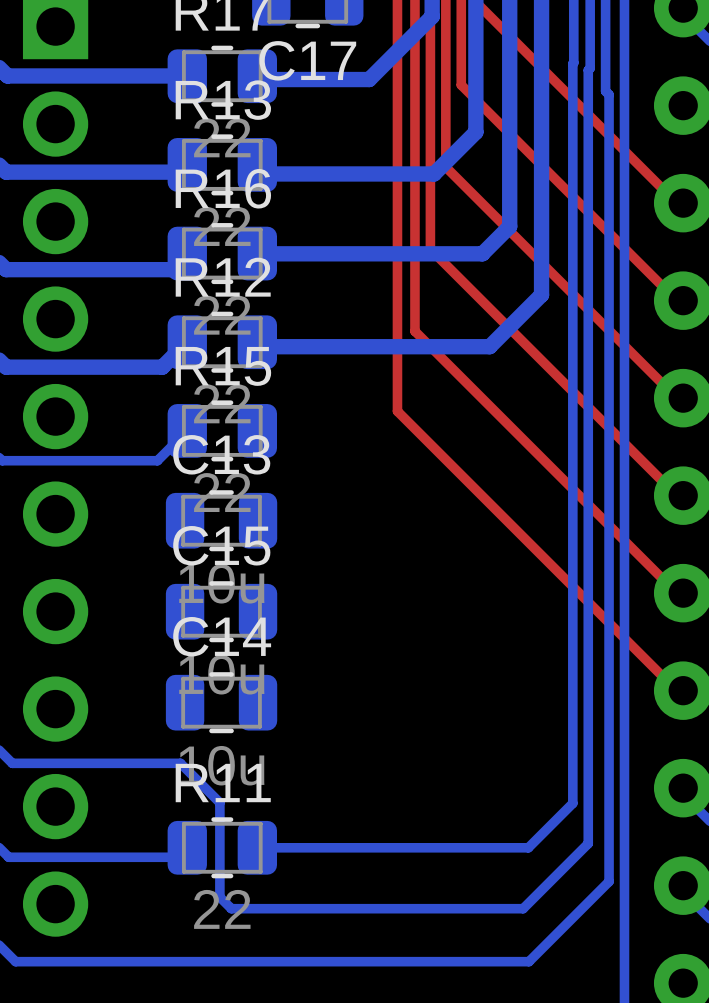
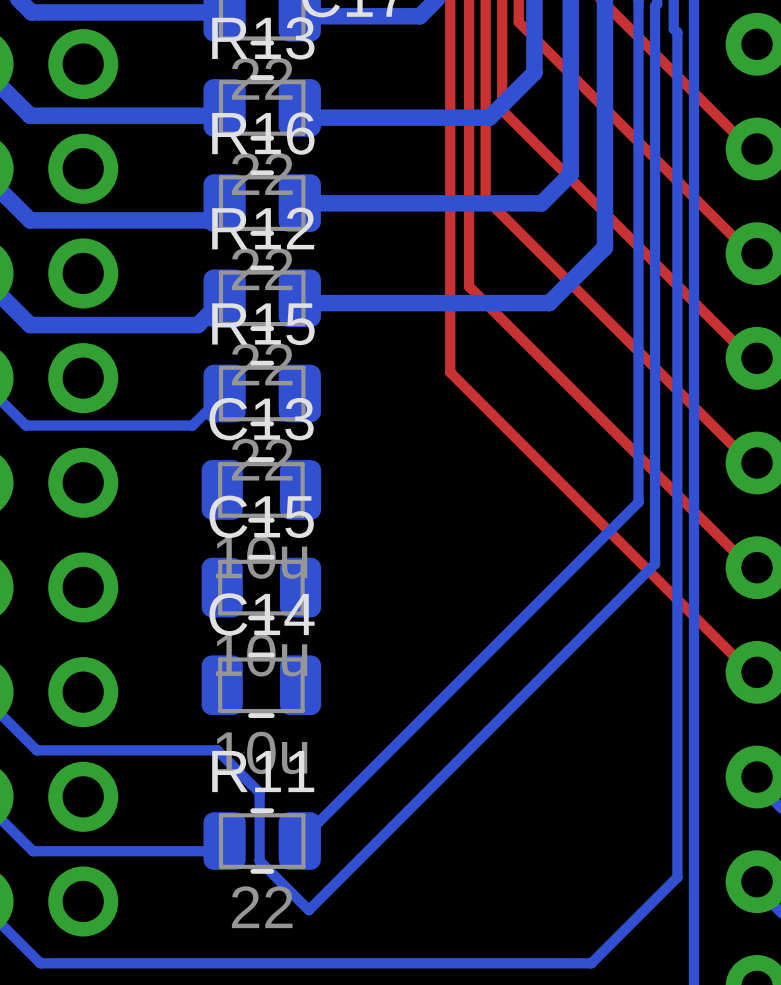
bottom track: (572, 532) (572, 803) (528, 847) (257, 847) -> (638, 502) (299, 841)
bottom track: (588, 589) (588, 843) (523, 908) (231, 908) (219, 897) (219, 866) -> (655, 563) (308, 910) (259, 860)

